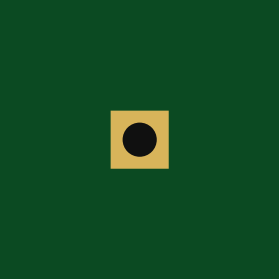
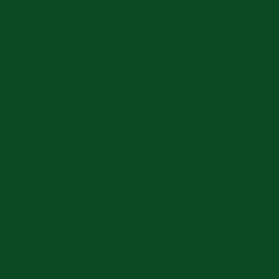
part: (139, 139) -> none

